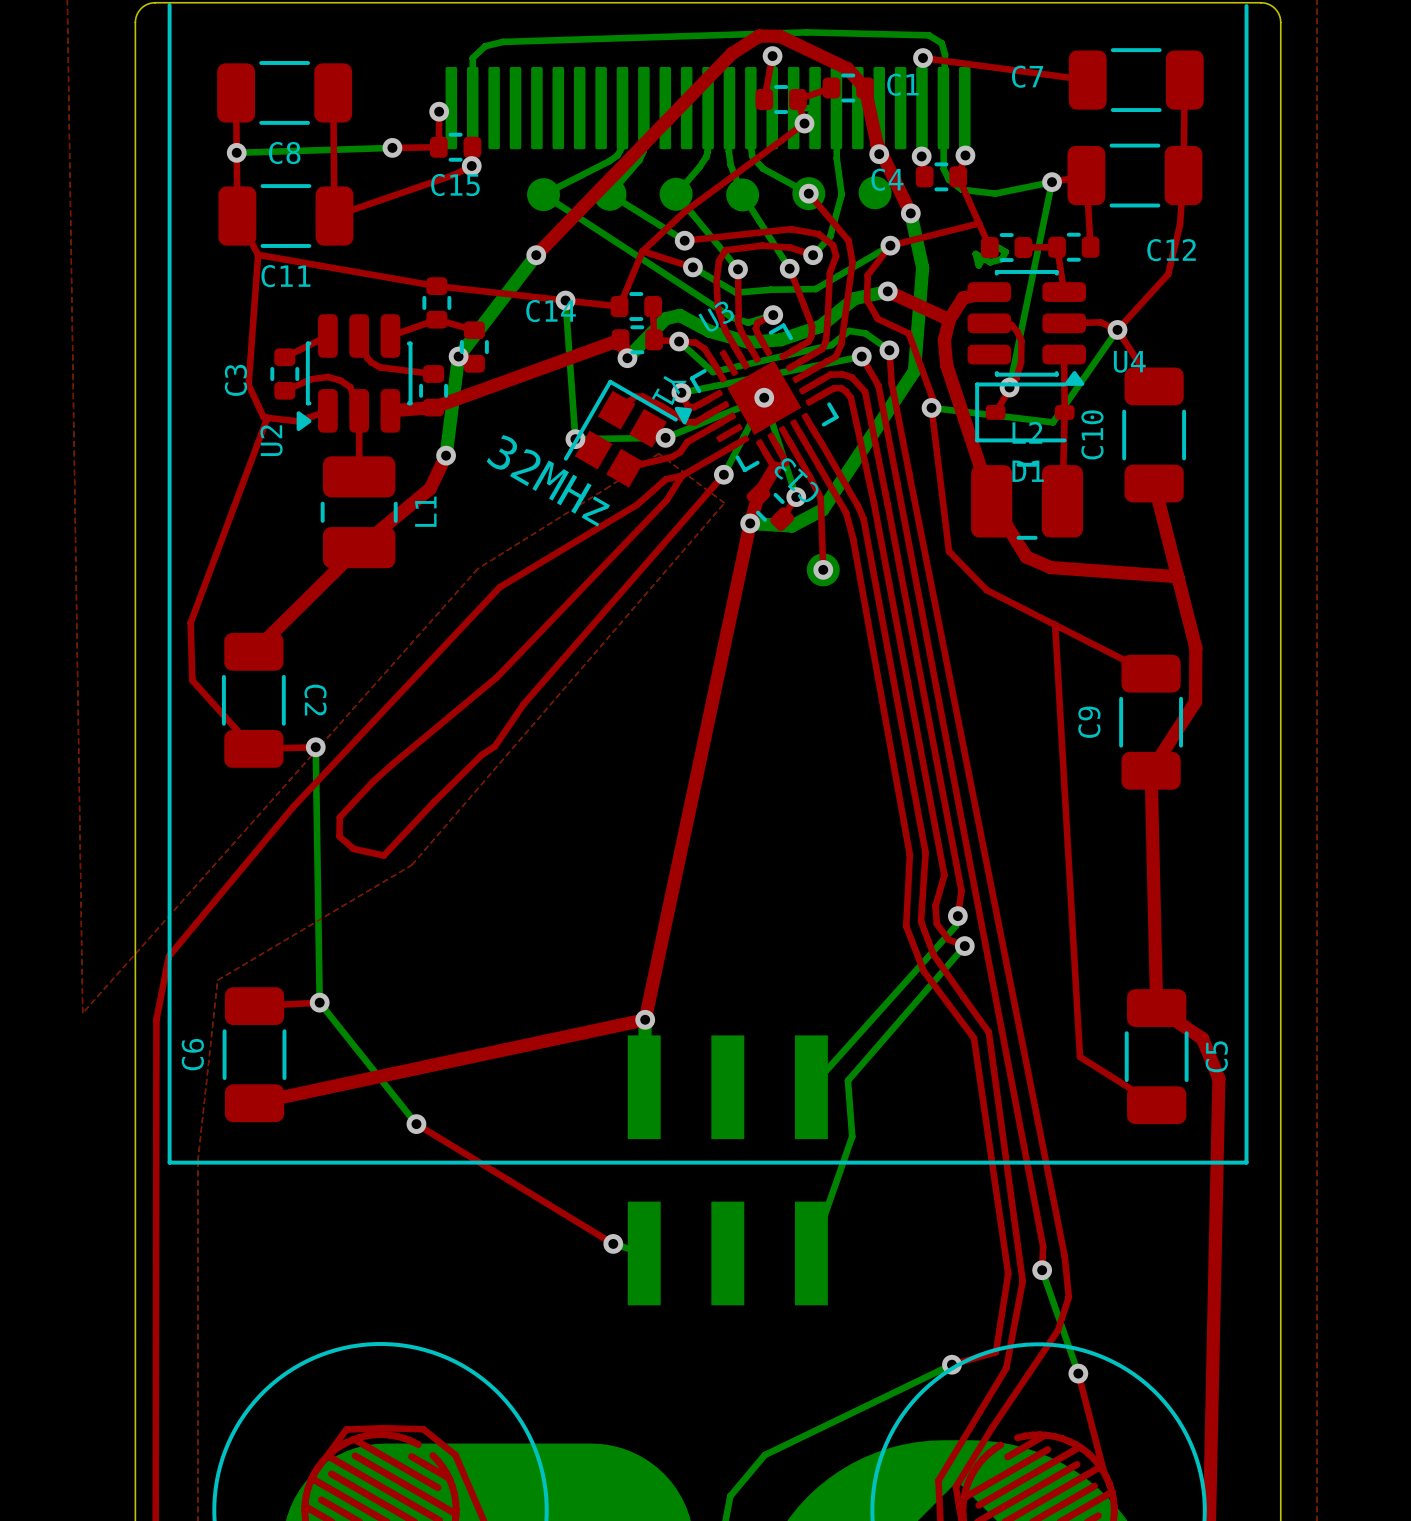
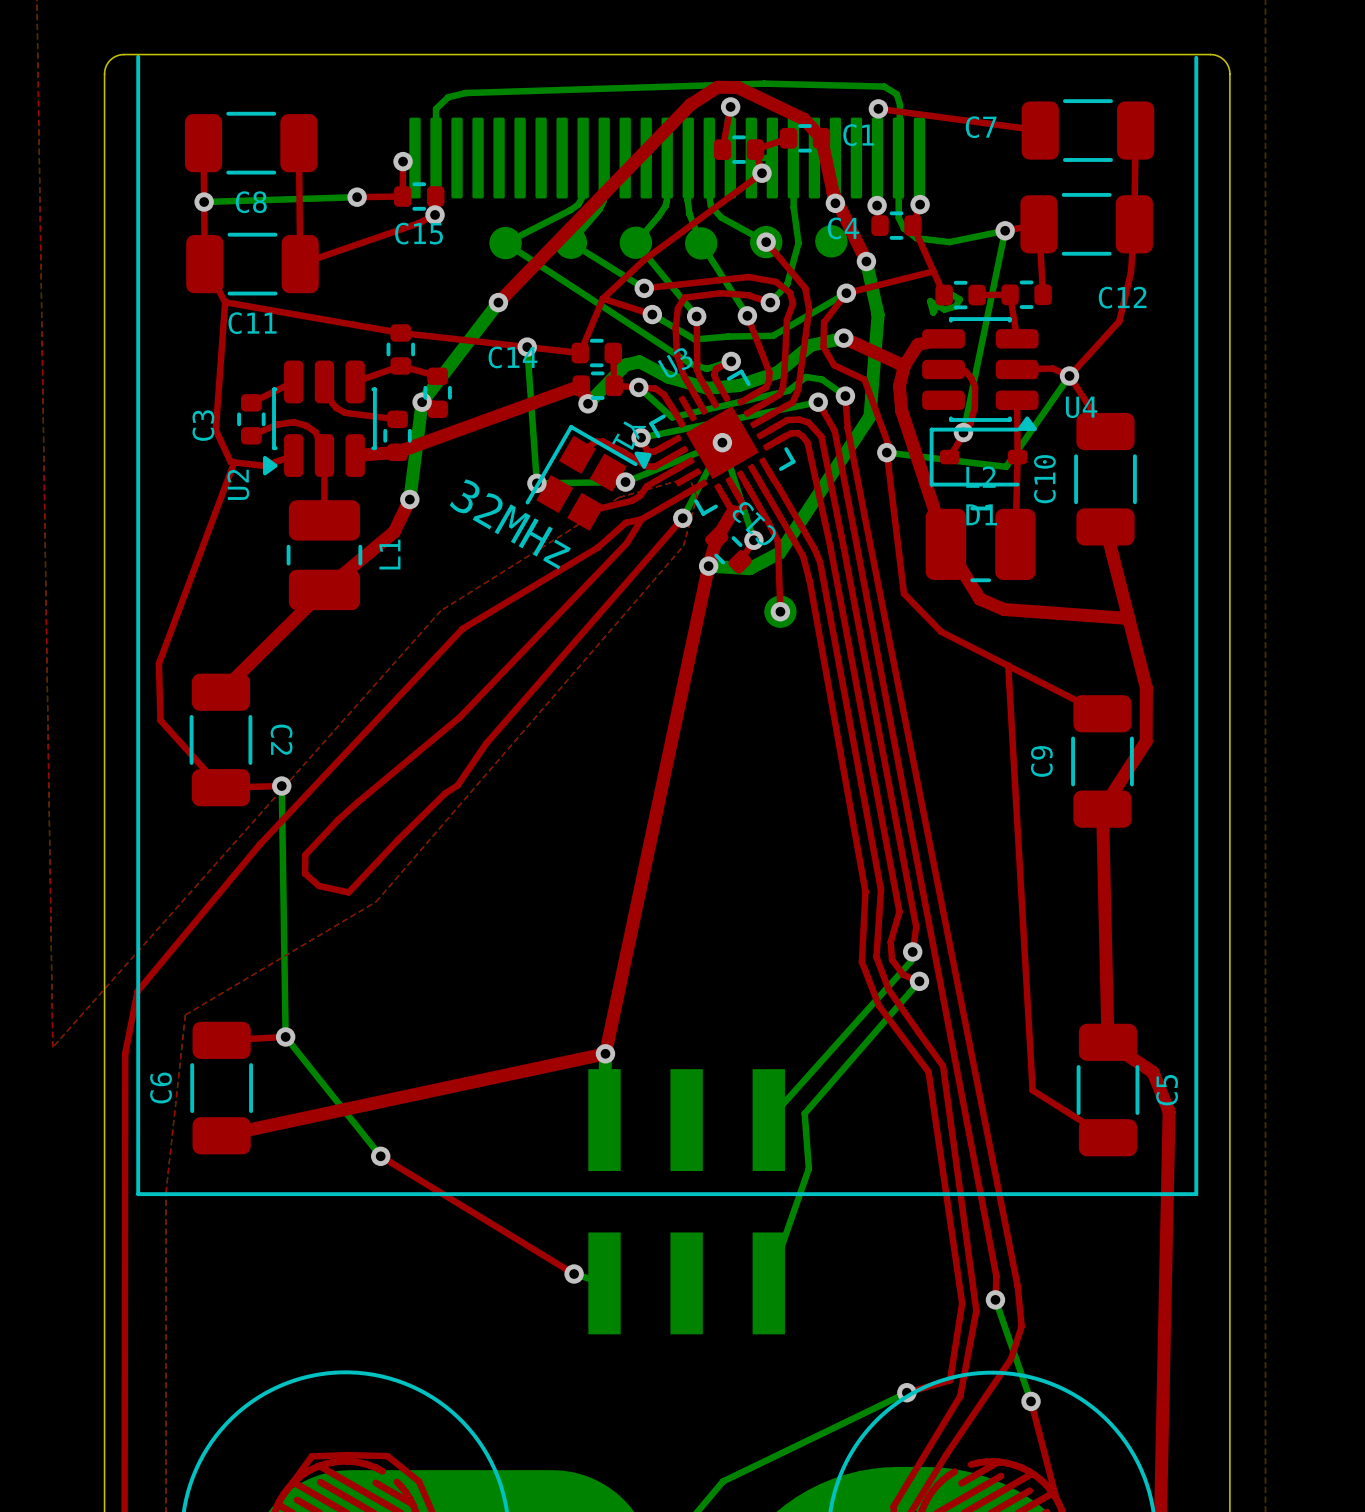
top zone outline: (658, 453) (724, 503) -> (618, 497) (689, 477) (696, 496) (683, 546)

